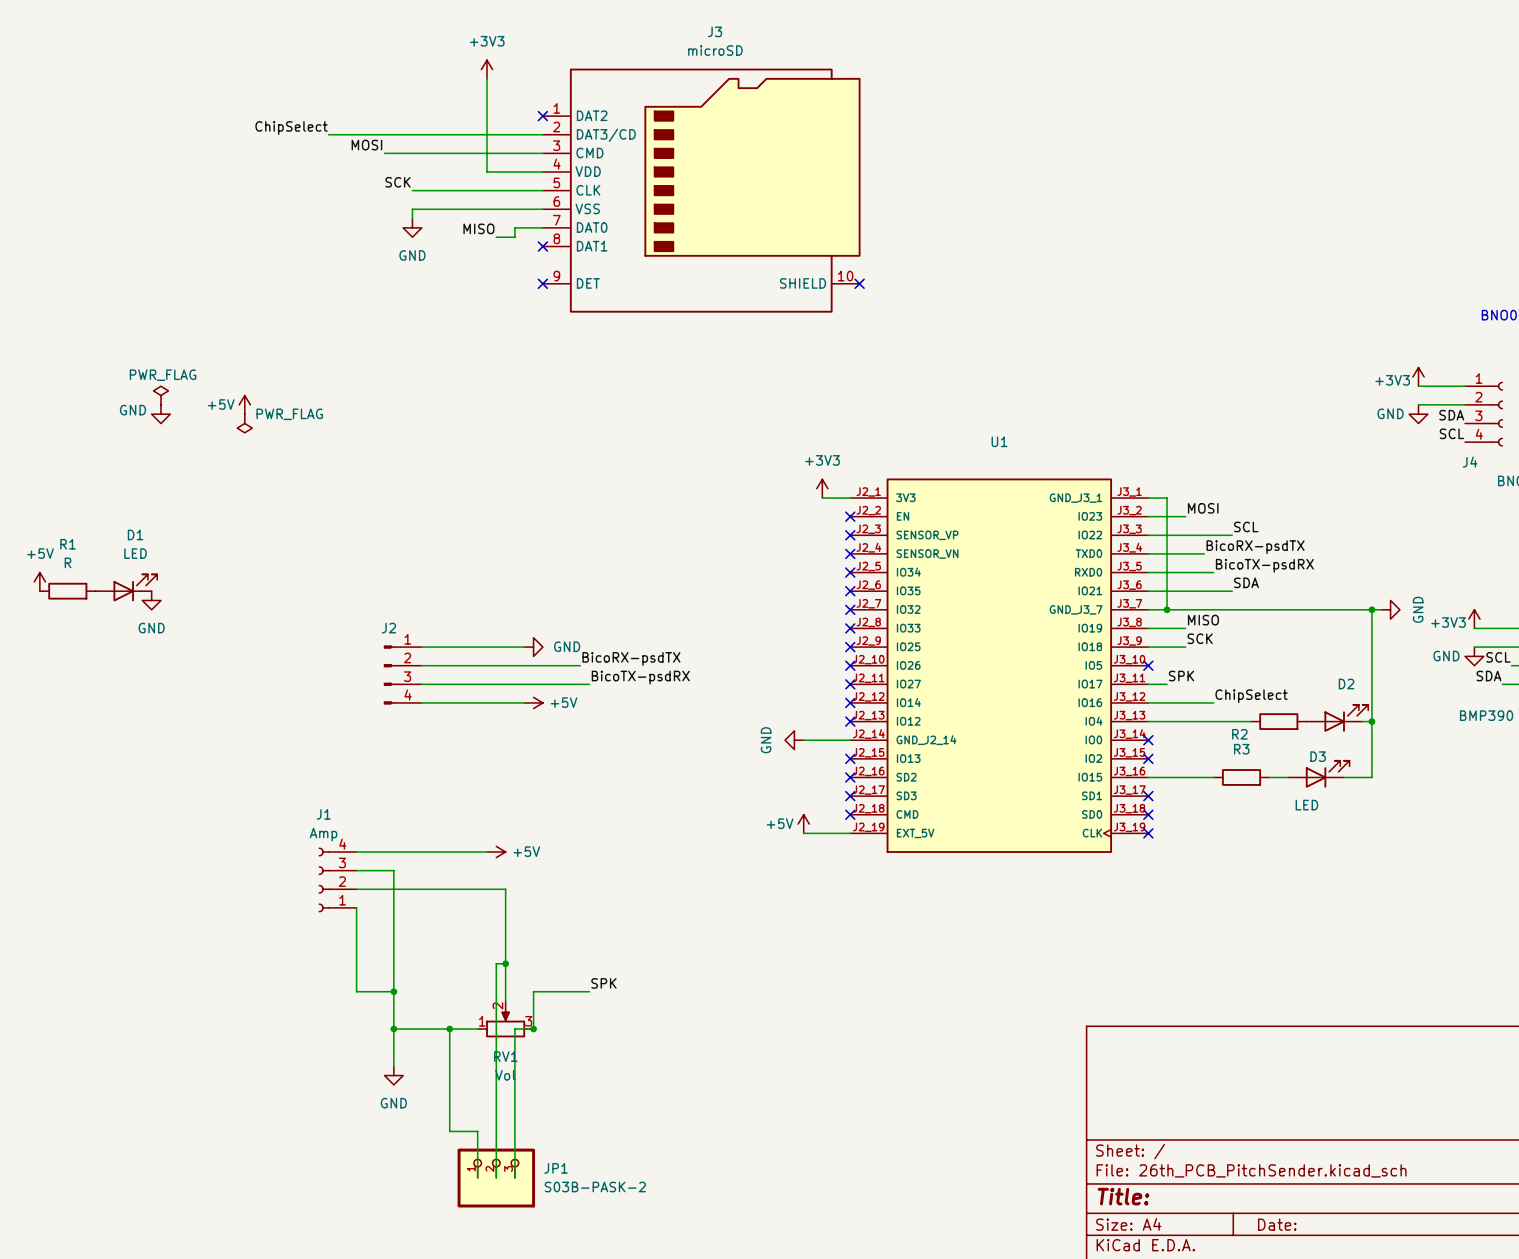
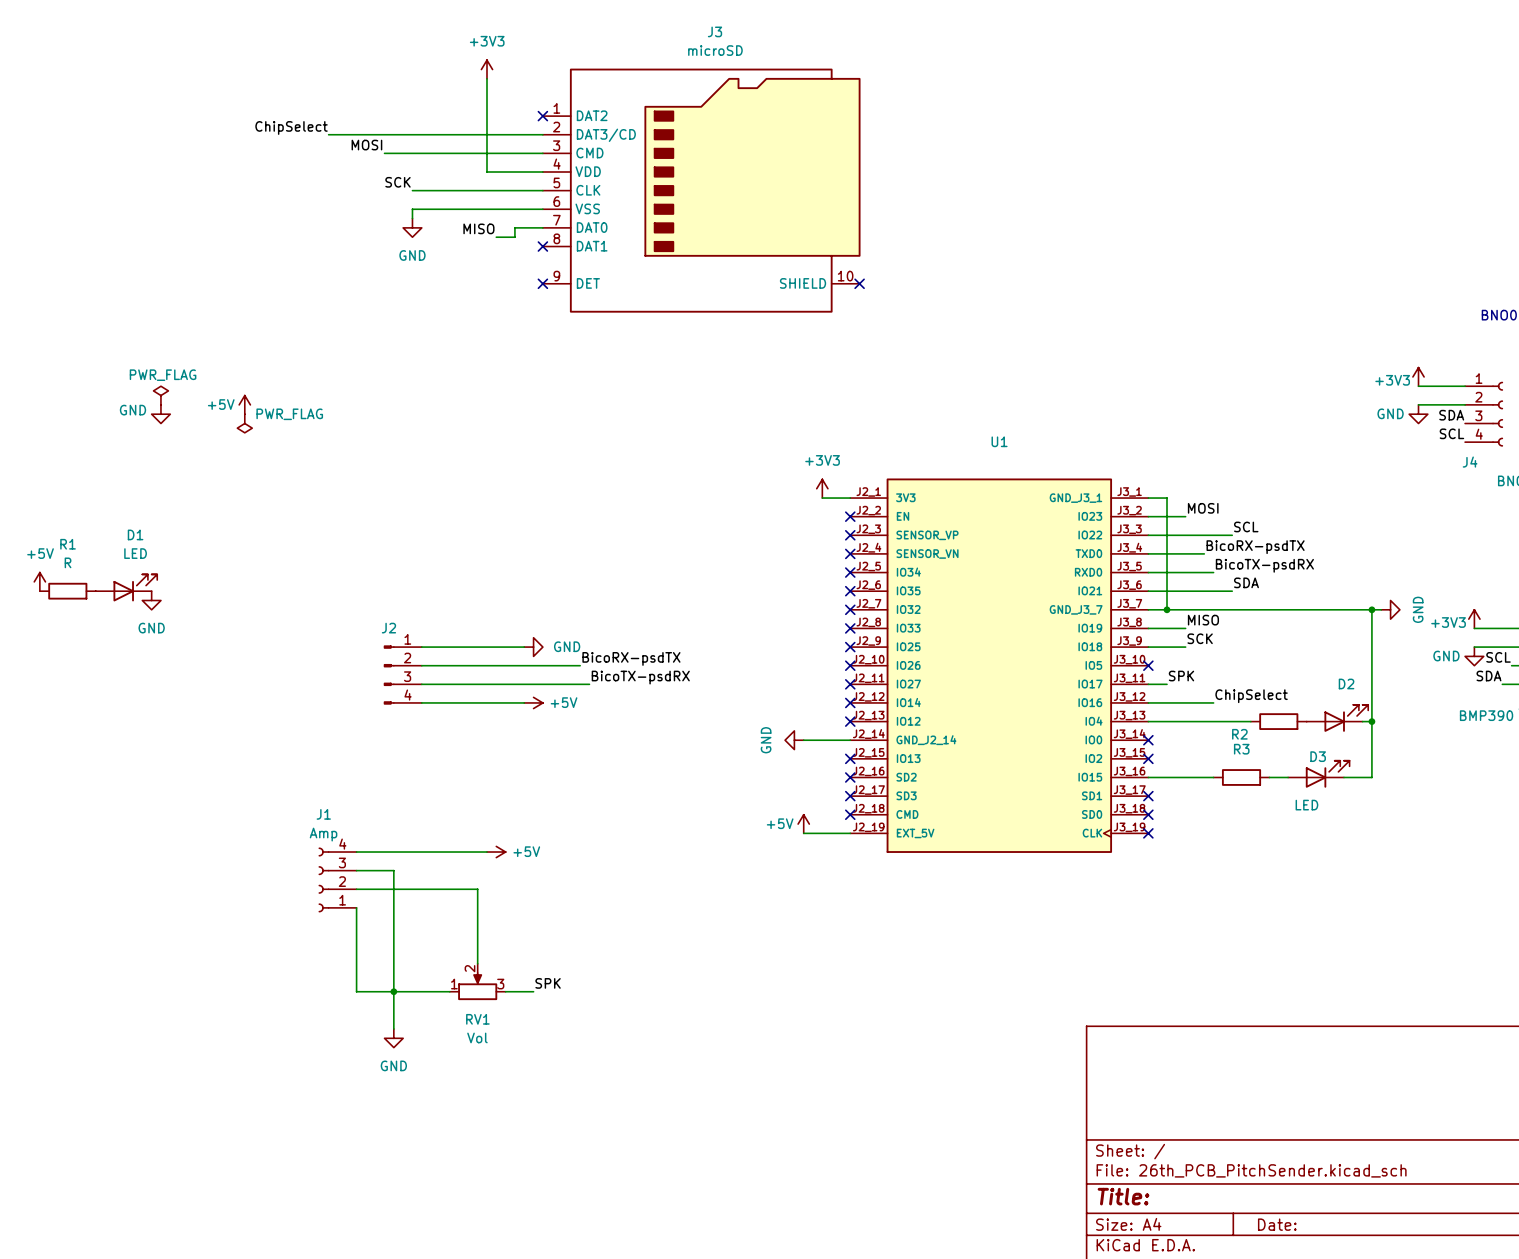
wire: (477, 889) (505, 889) (505, 1001) -> (477, 889) (477, 963)
wire: (505, 963) (496, 963) (496, 1178) -> none
junction: (505, 963) -> none
label position: SPK (603, 983) -> SPK (548, 983)
wire: none -> (393, 991) (449, 991)
wire: none -> (505, 991) (533, 991)
wire: (589, 991) (533, 991) (533, 1028) (514, 1028) (514, 1178) -> none
RV1 position: (505, 1019) -> (477, 981)
junction: (393, 1028) -> none
wire: (449, 1028) (449, 1131) (477, 1131) (477, 1178) -> none
junction: (449, 1028) -> none
wire: (477, 1028) (393, 1028) (393, 1066) -> none
junction: (533, 1028) -> none
power symbol position: GND (393, 1075) -> GND (393, 1038)
JP1: S03B-PASK-2 (496, 1178) -> none

